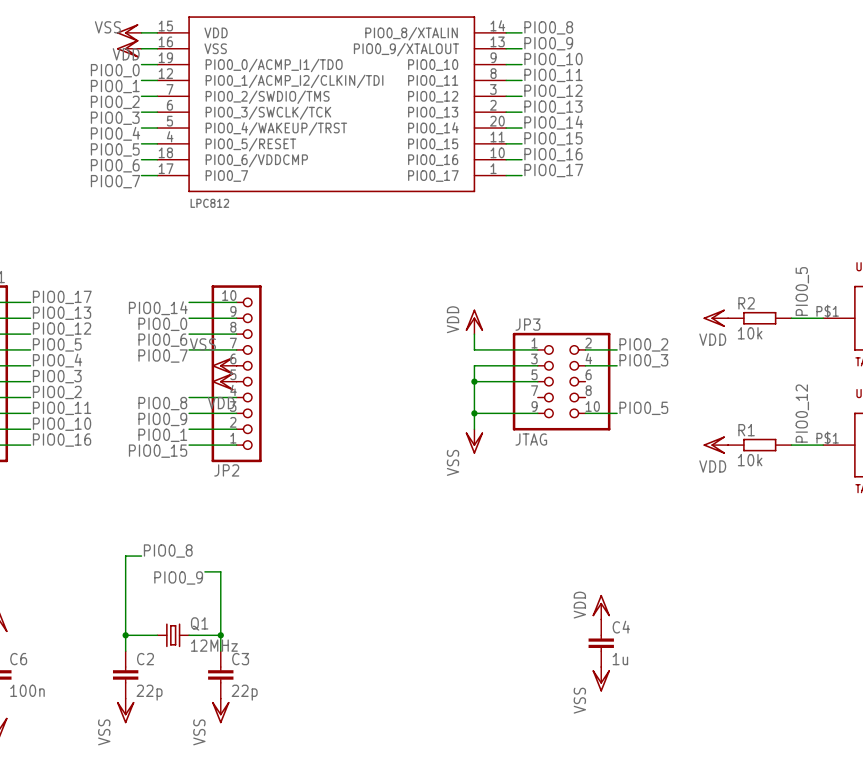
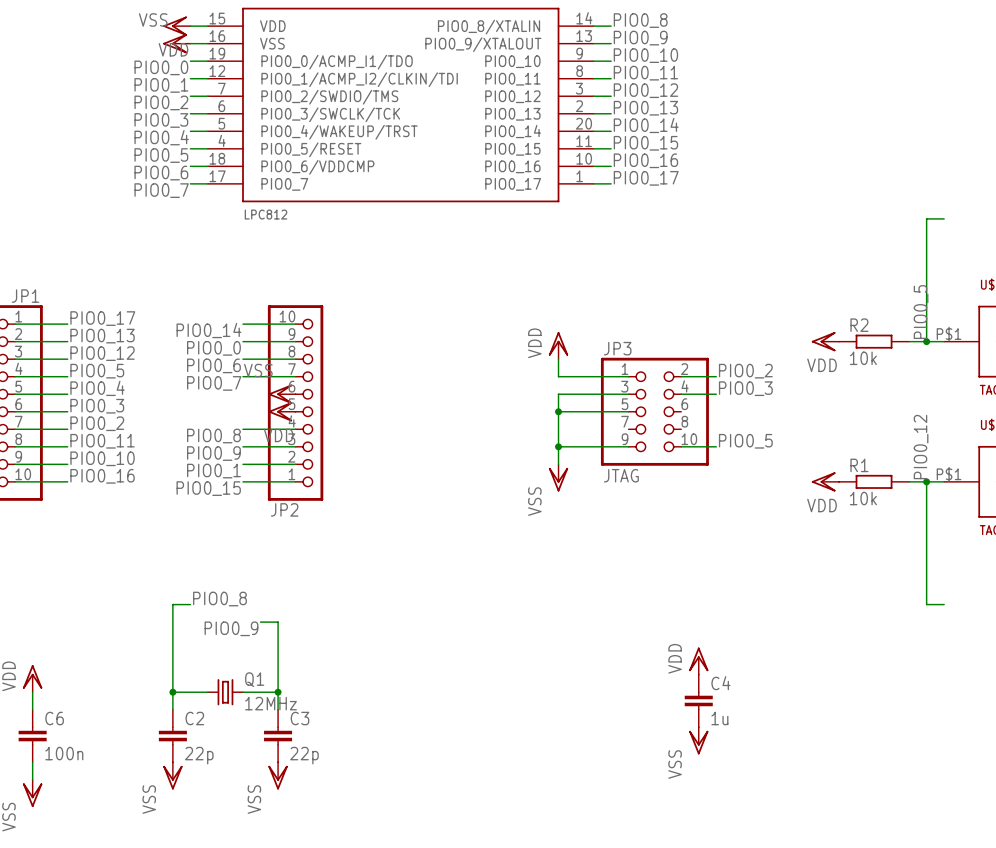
wire: none -> (944, 218) (926, 218) (926, 341)
junction: none -> (926, 341)
wire: none -> (926, 481) (926, 604) (944, 604)
junction: none -> (926, 481)

